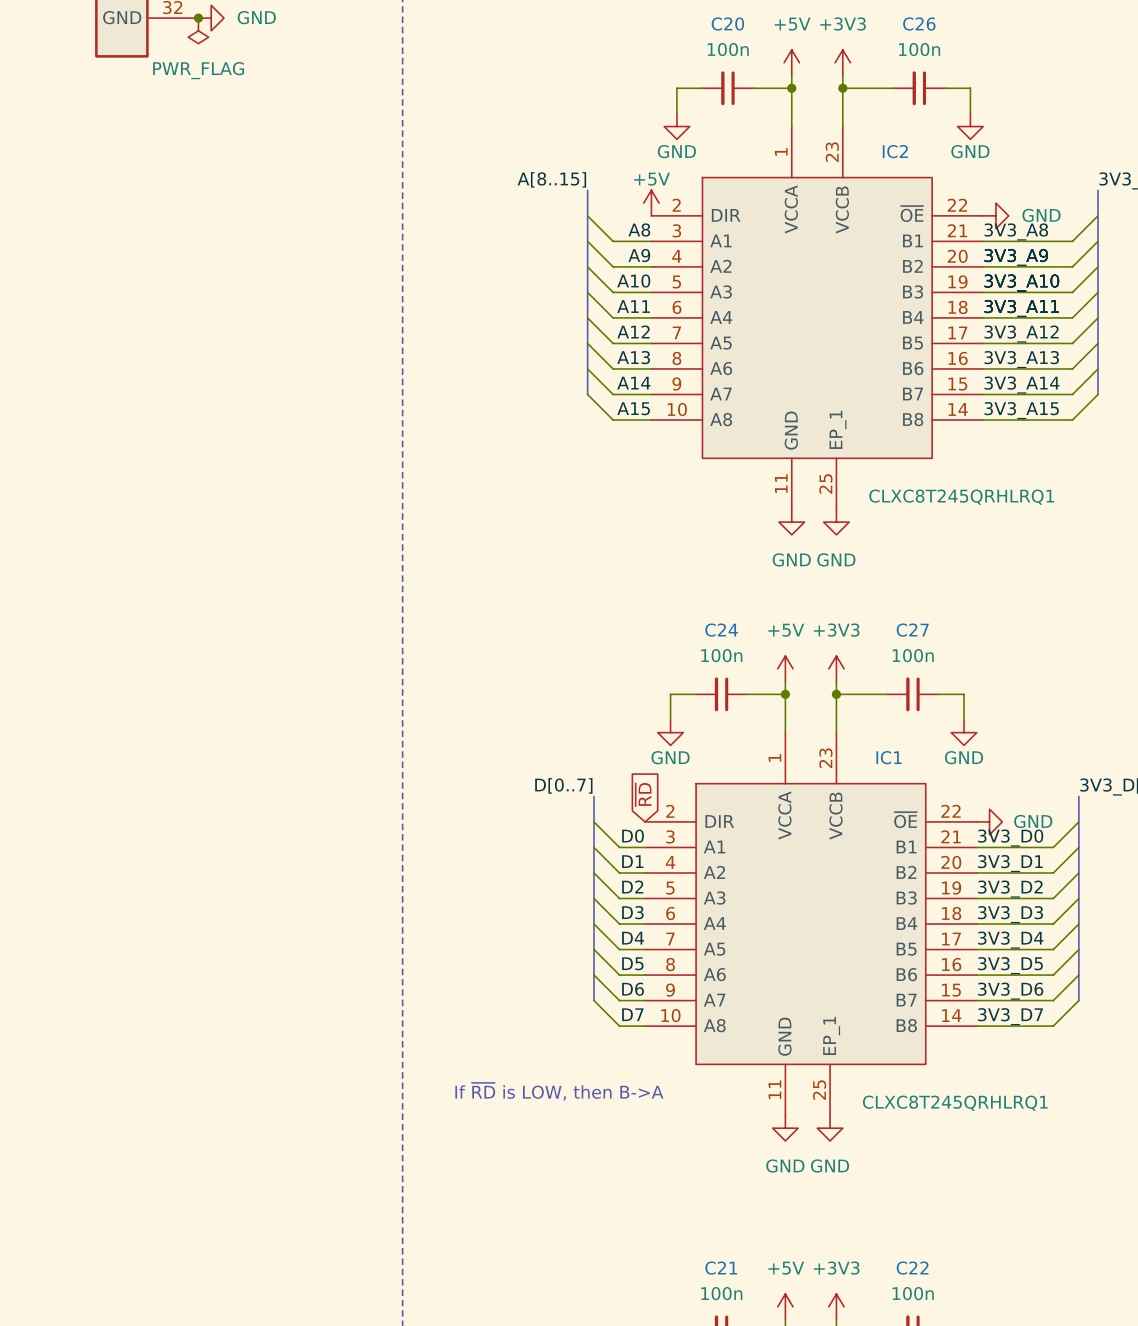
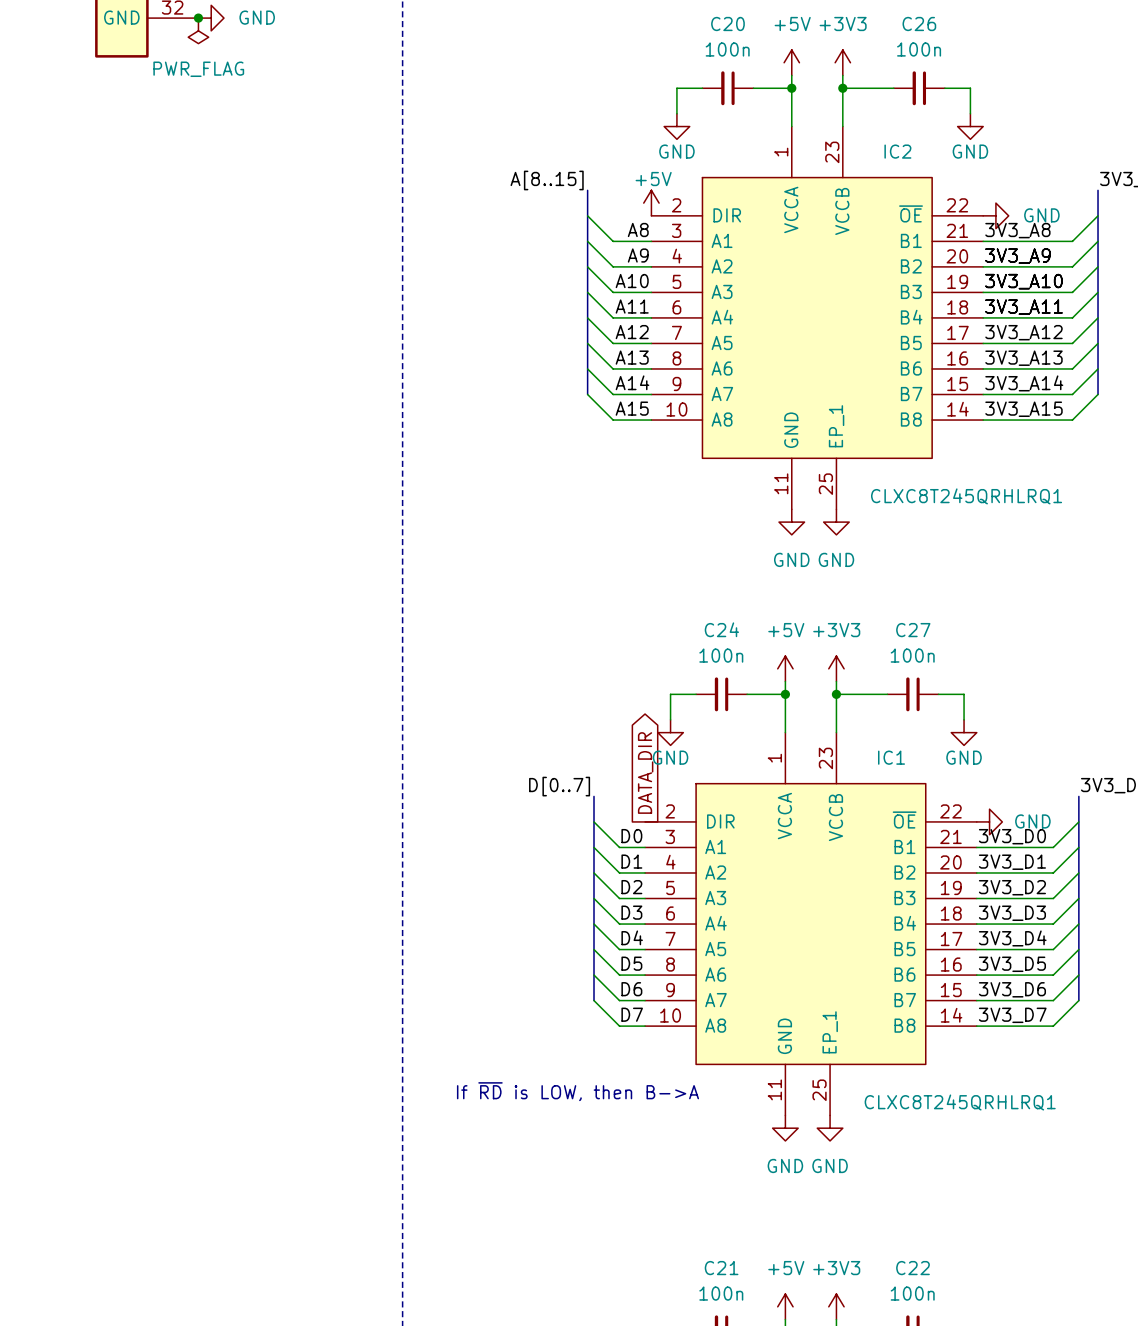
global label shape: input (643, 794) -> output (645, 773)
global label: ~{RD} (643, 794) -> DATA_DIR (645, 773)

